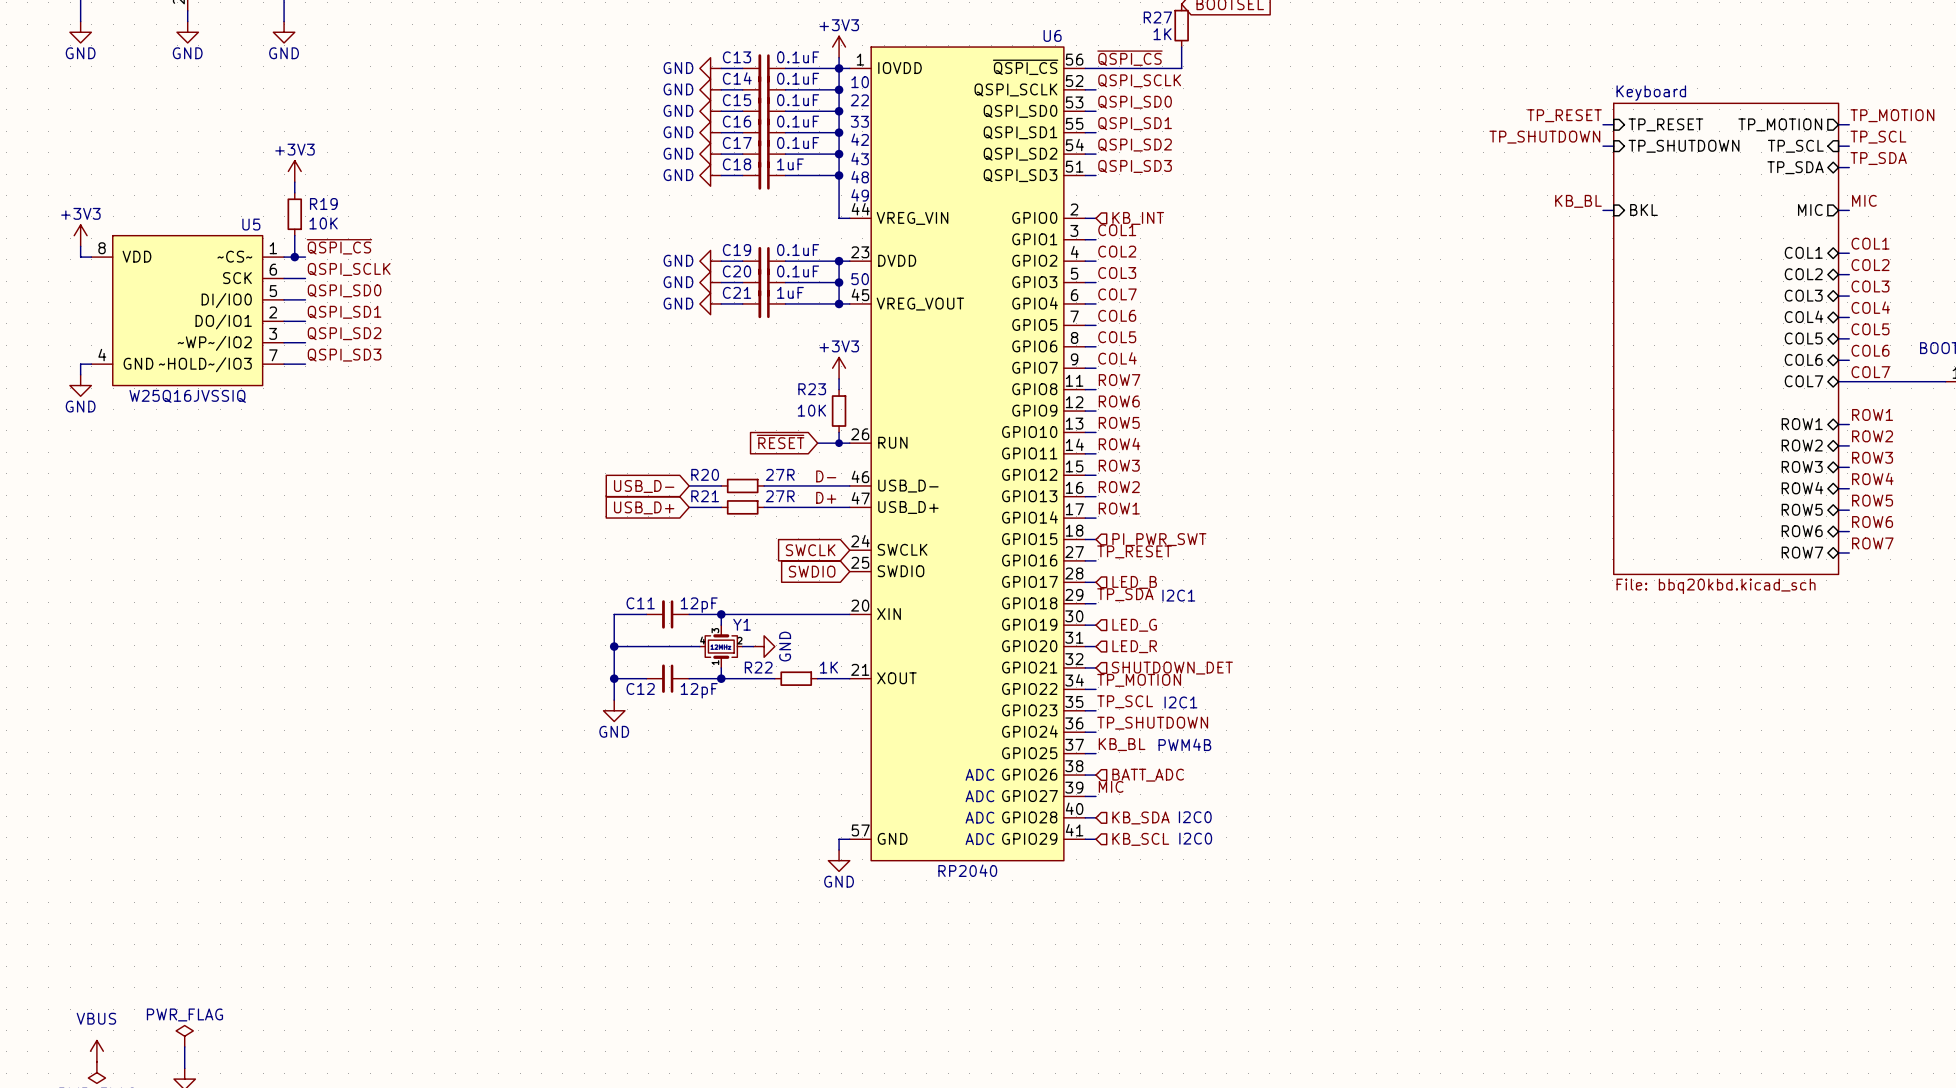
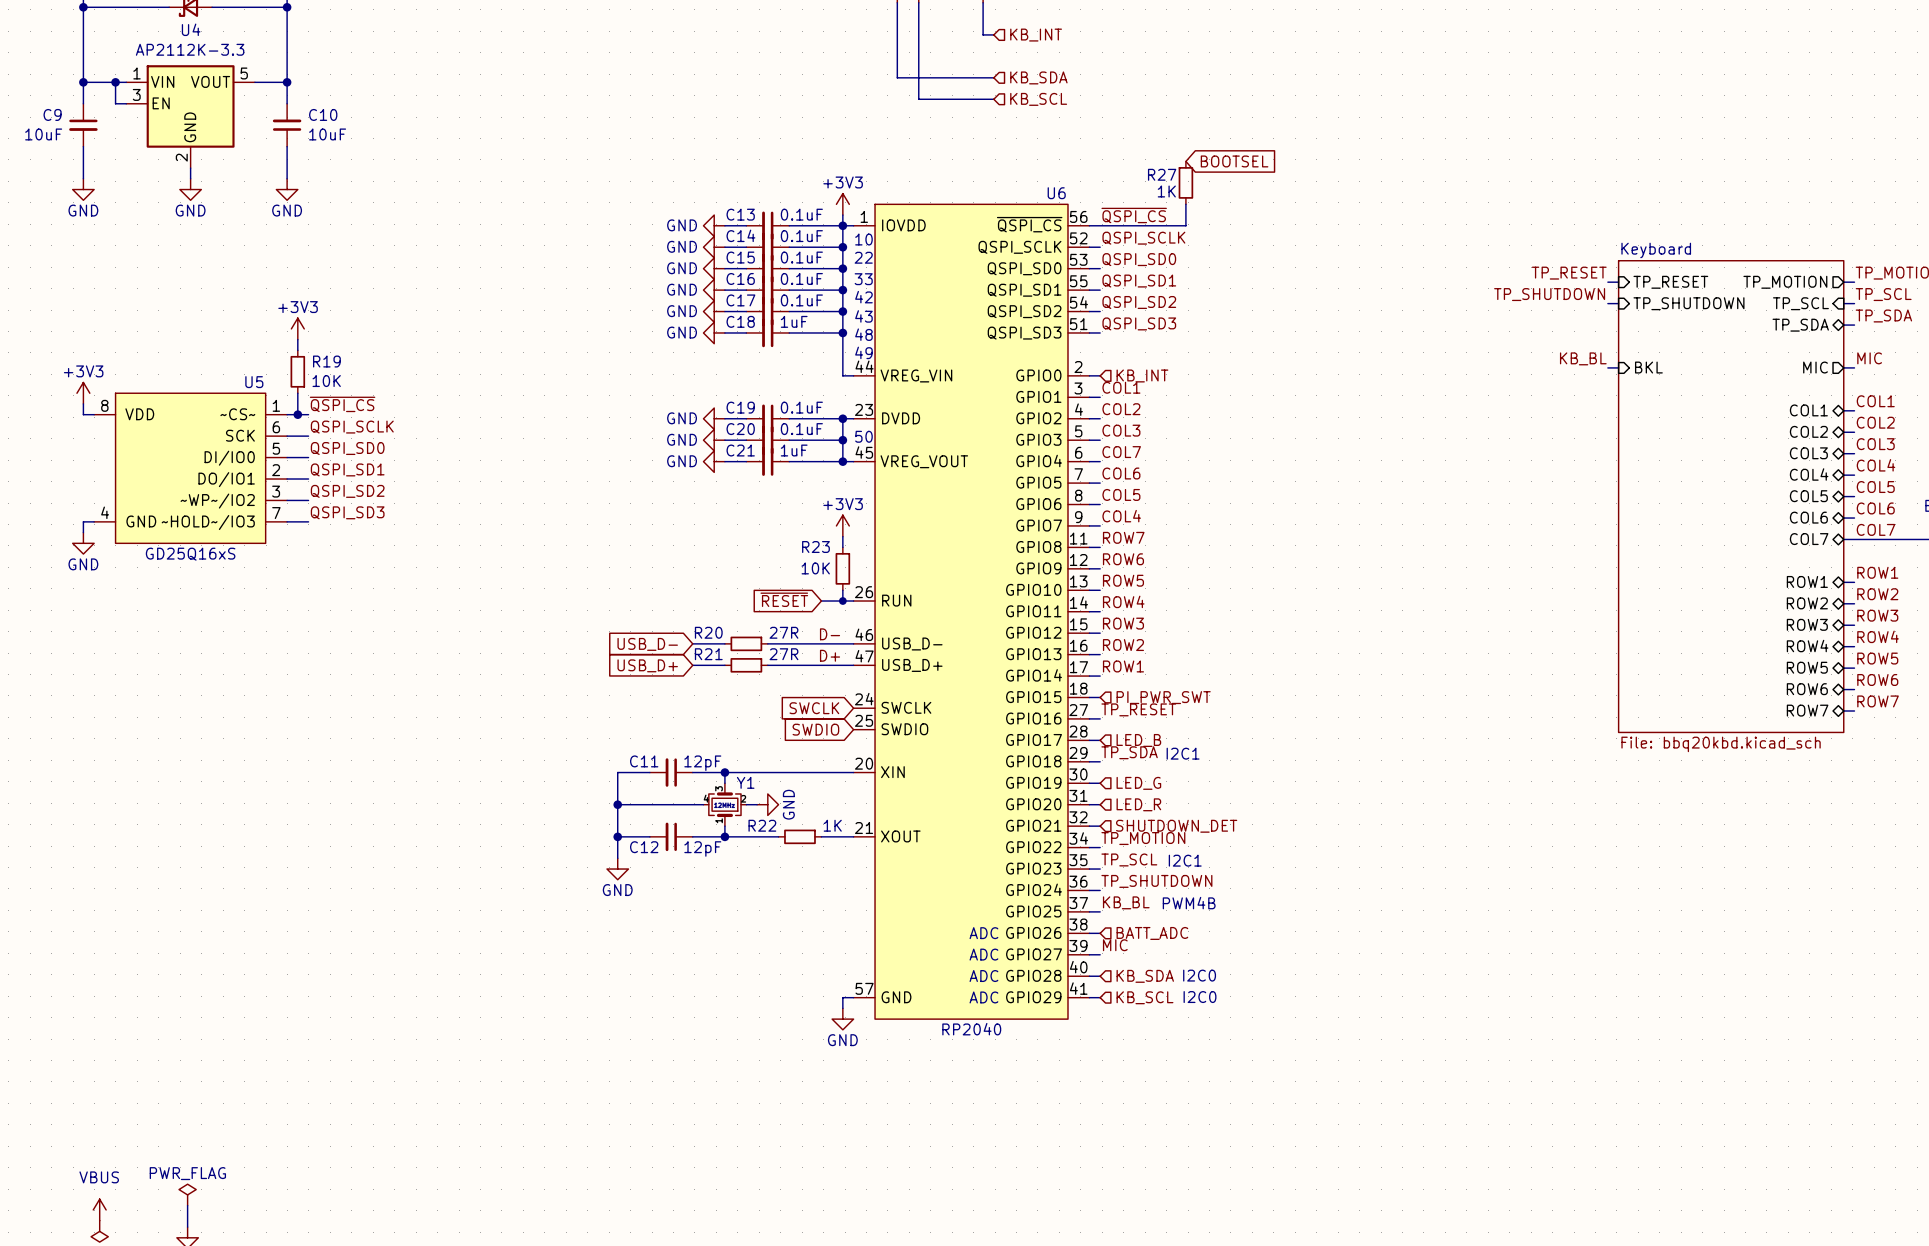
U5 value: W25Q16JVSSIQ (187, 396) -> GD25Q16xS (190, 554)

